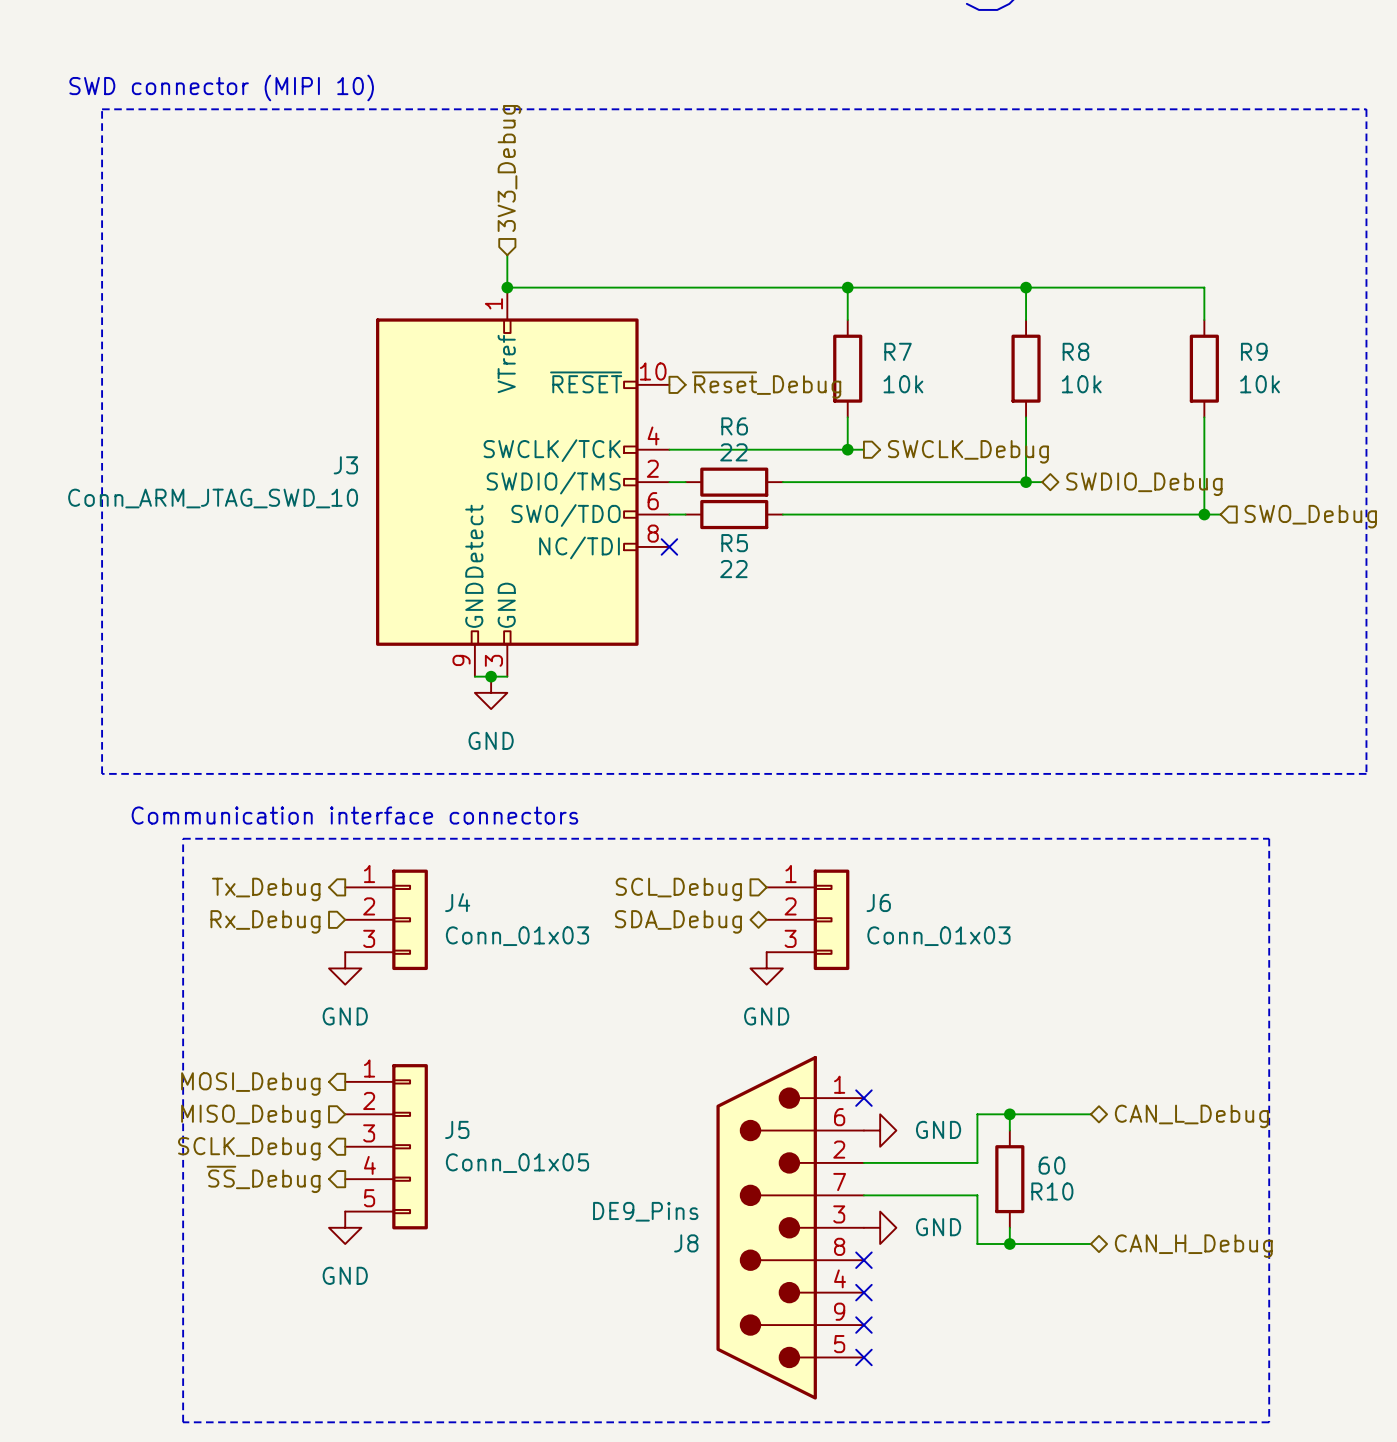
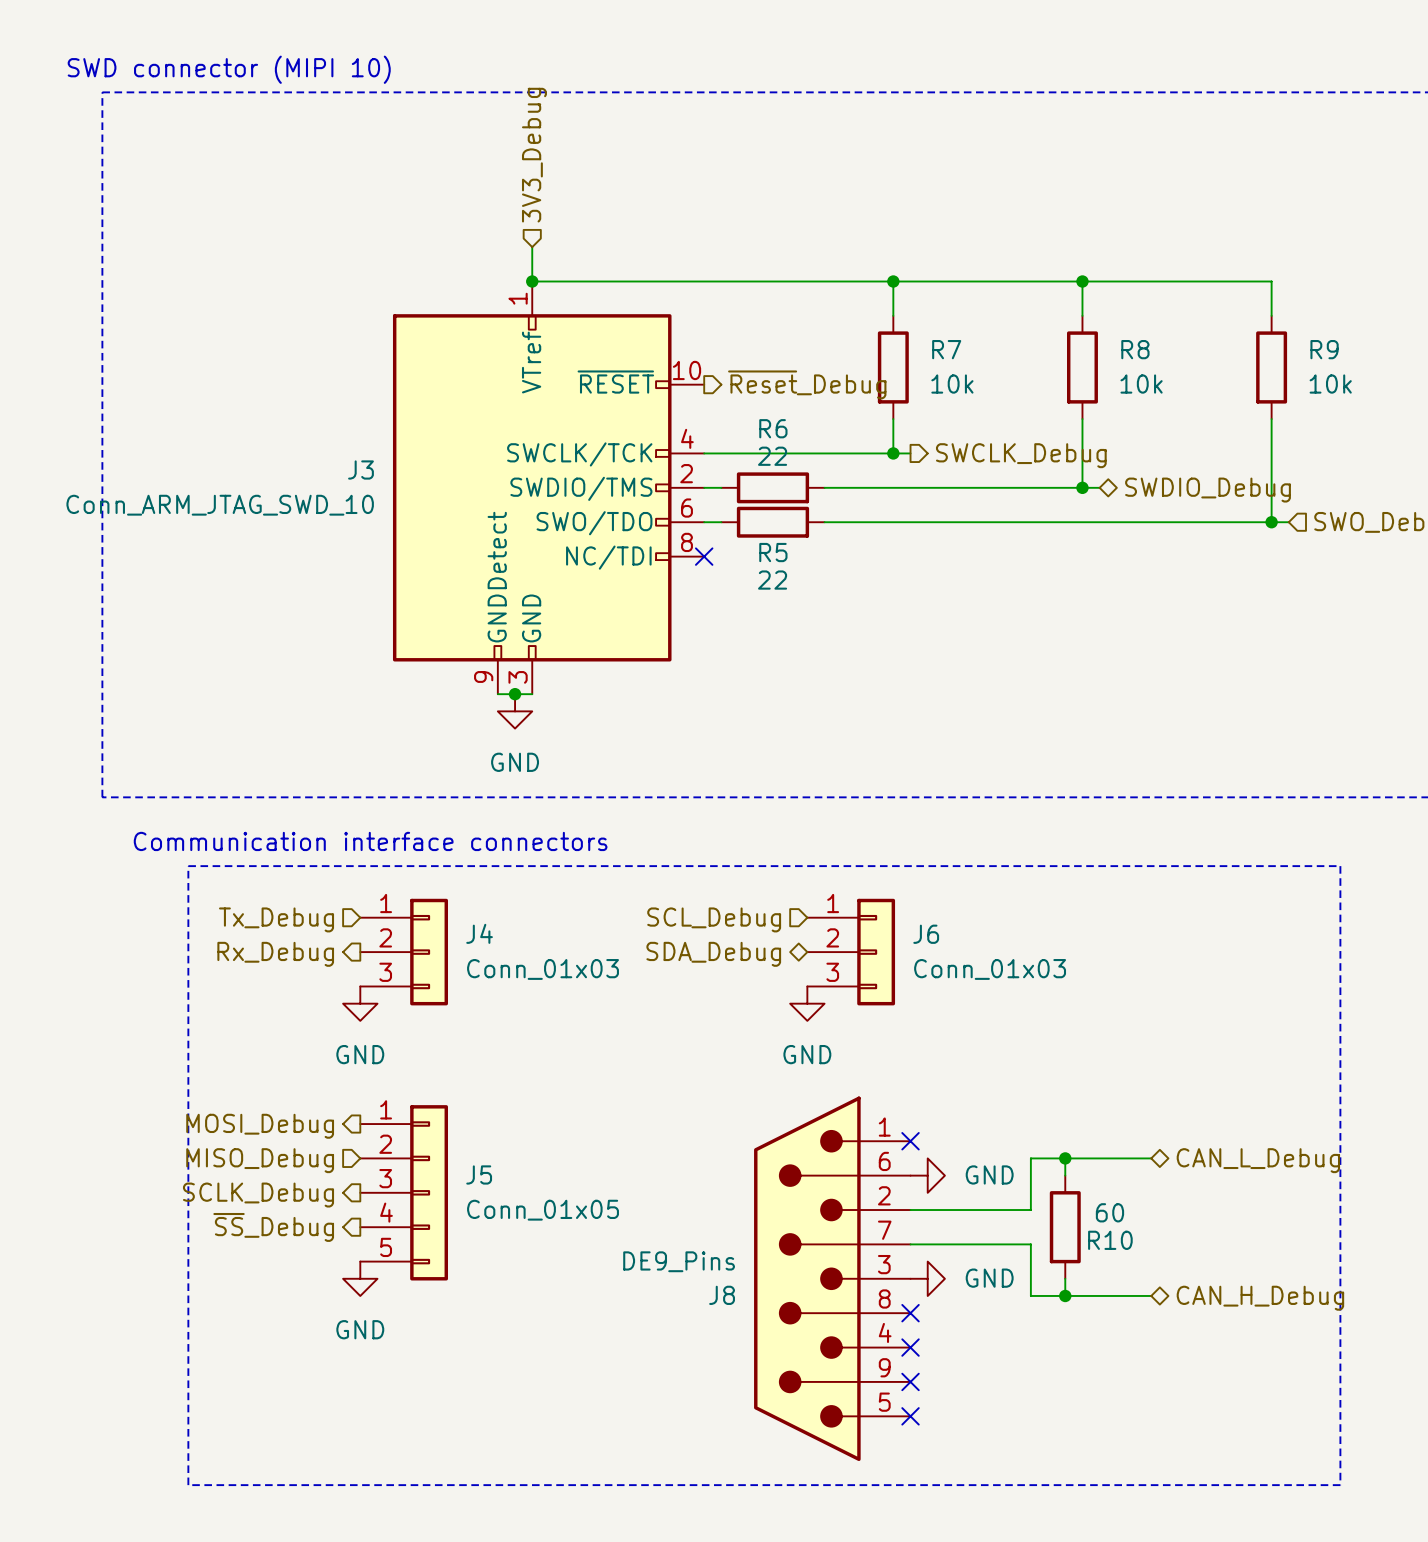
hierarchical label shape: output (266, 889) -> input (276, 919)
hierarchical label shape: input (265, 921) -> output (275, 954)

